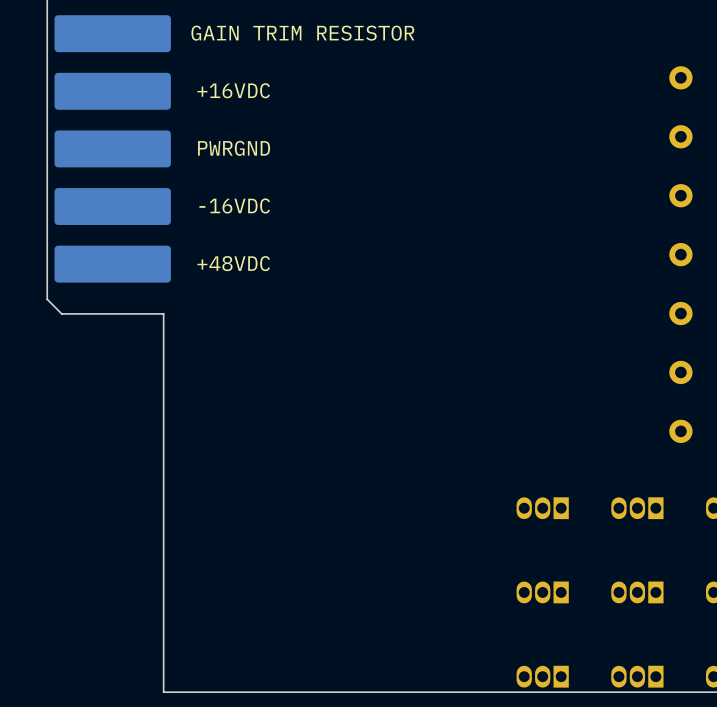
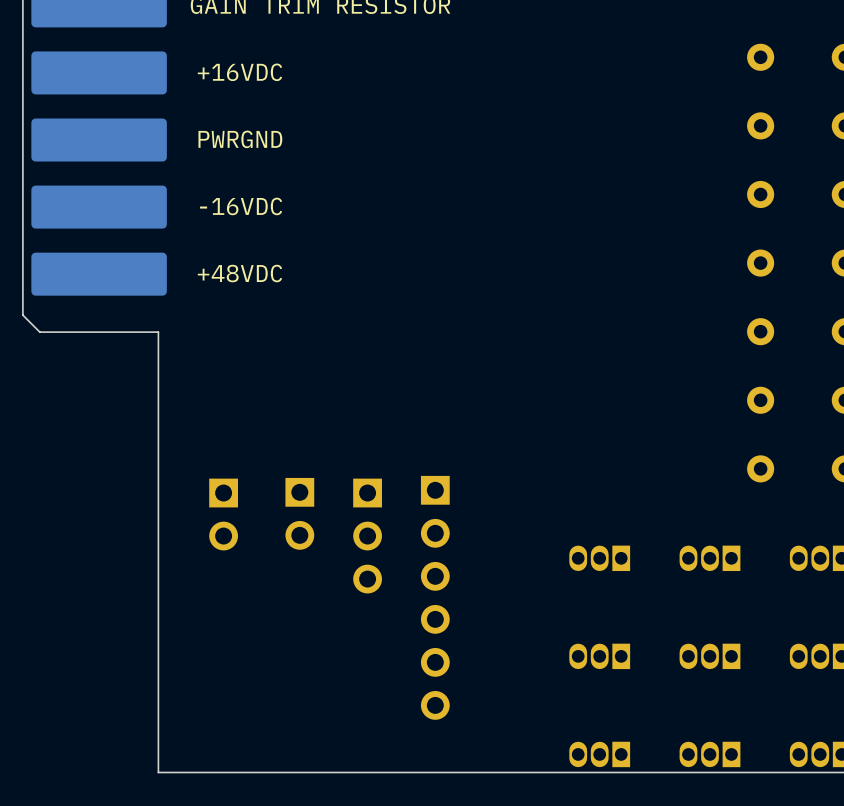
part: none -> (223, 514)
part: none -> (299, 513)
part: none -> (367, 536)
part: none -> (435, 597)

